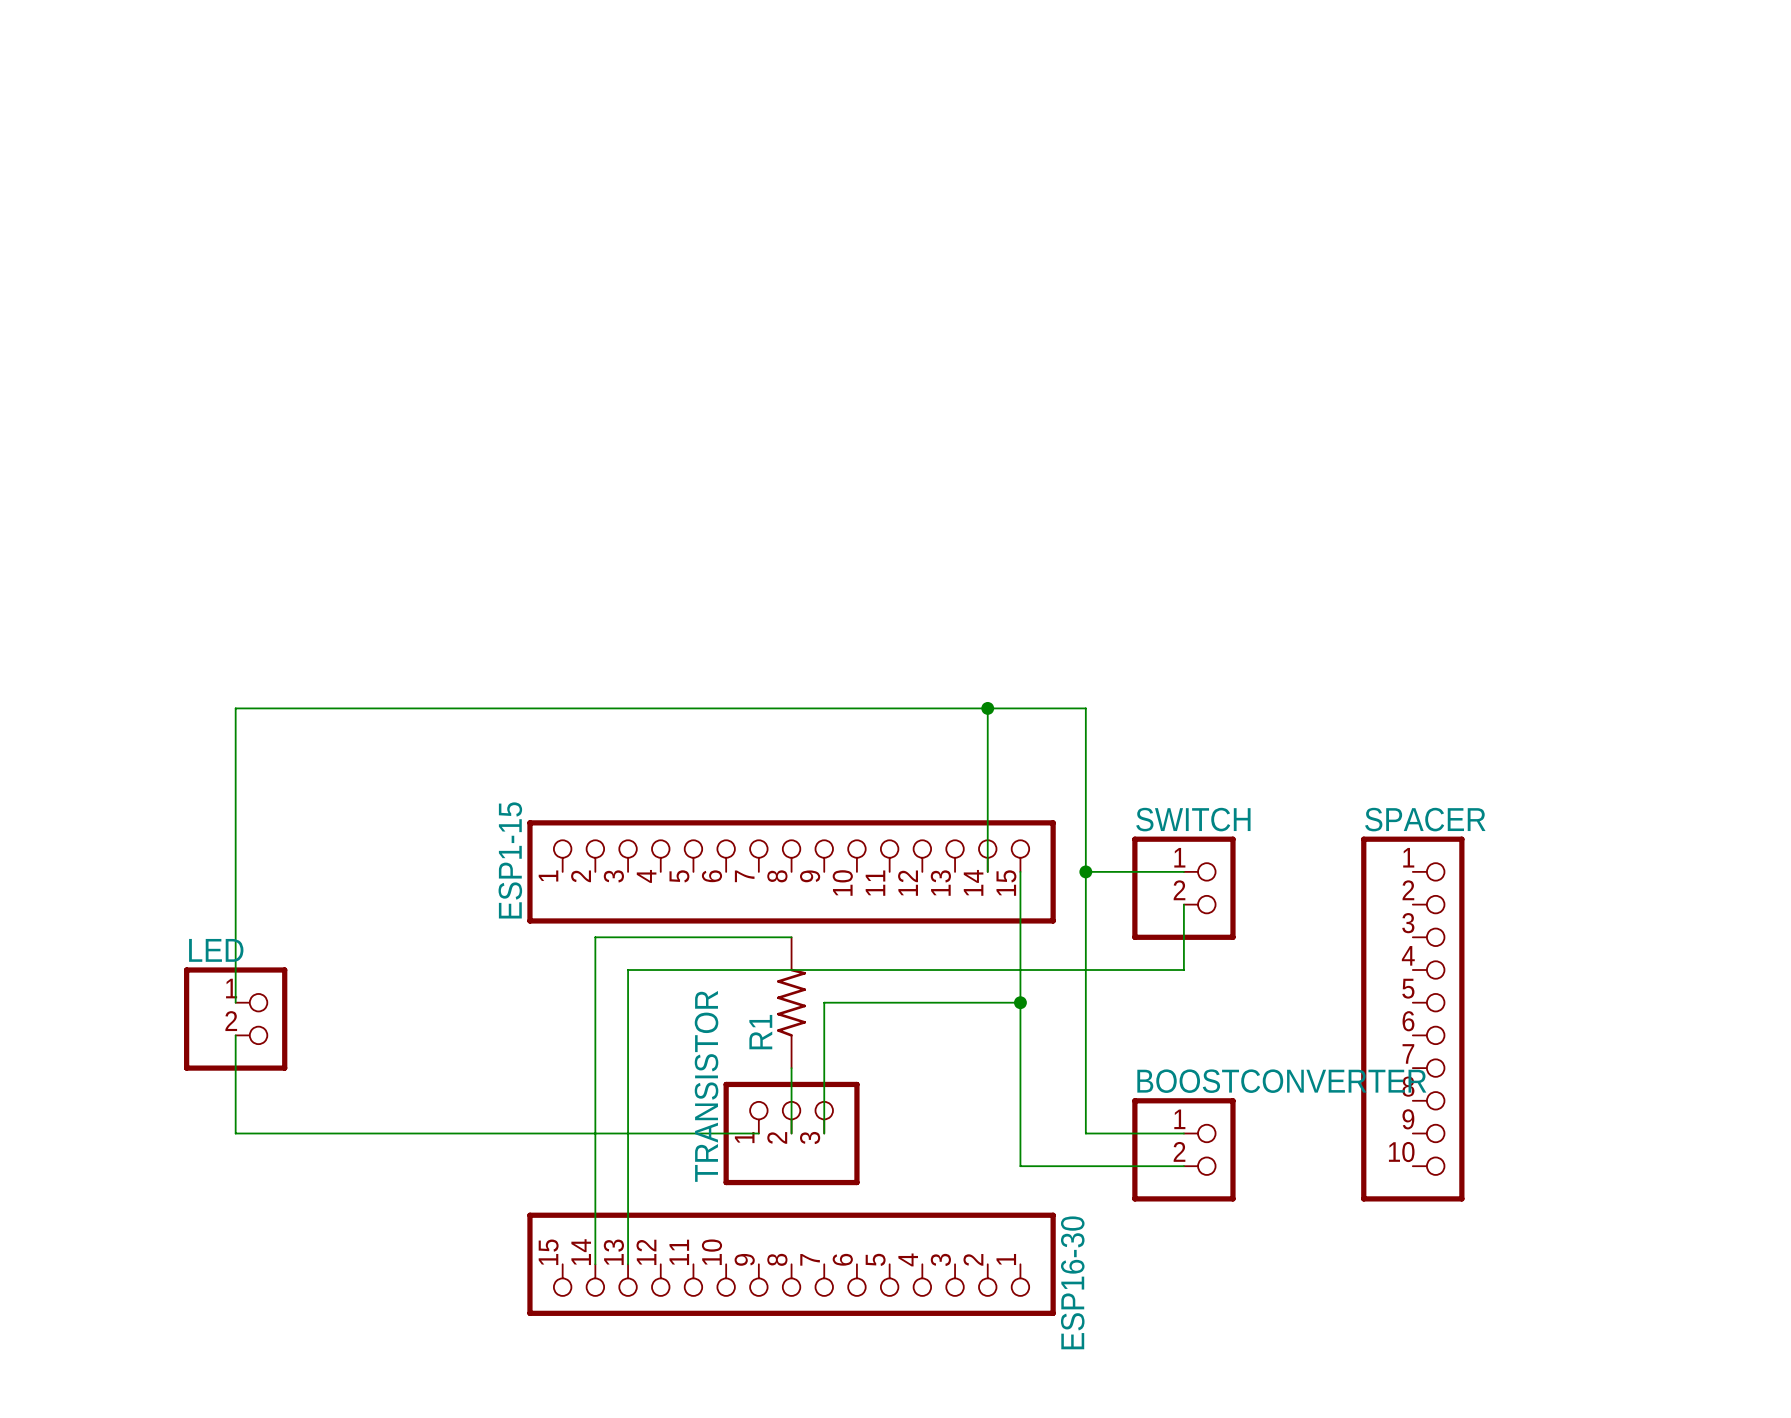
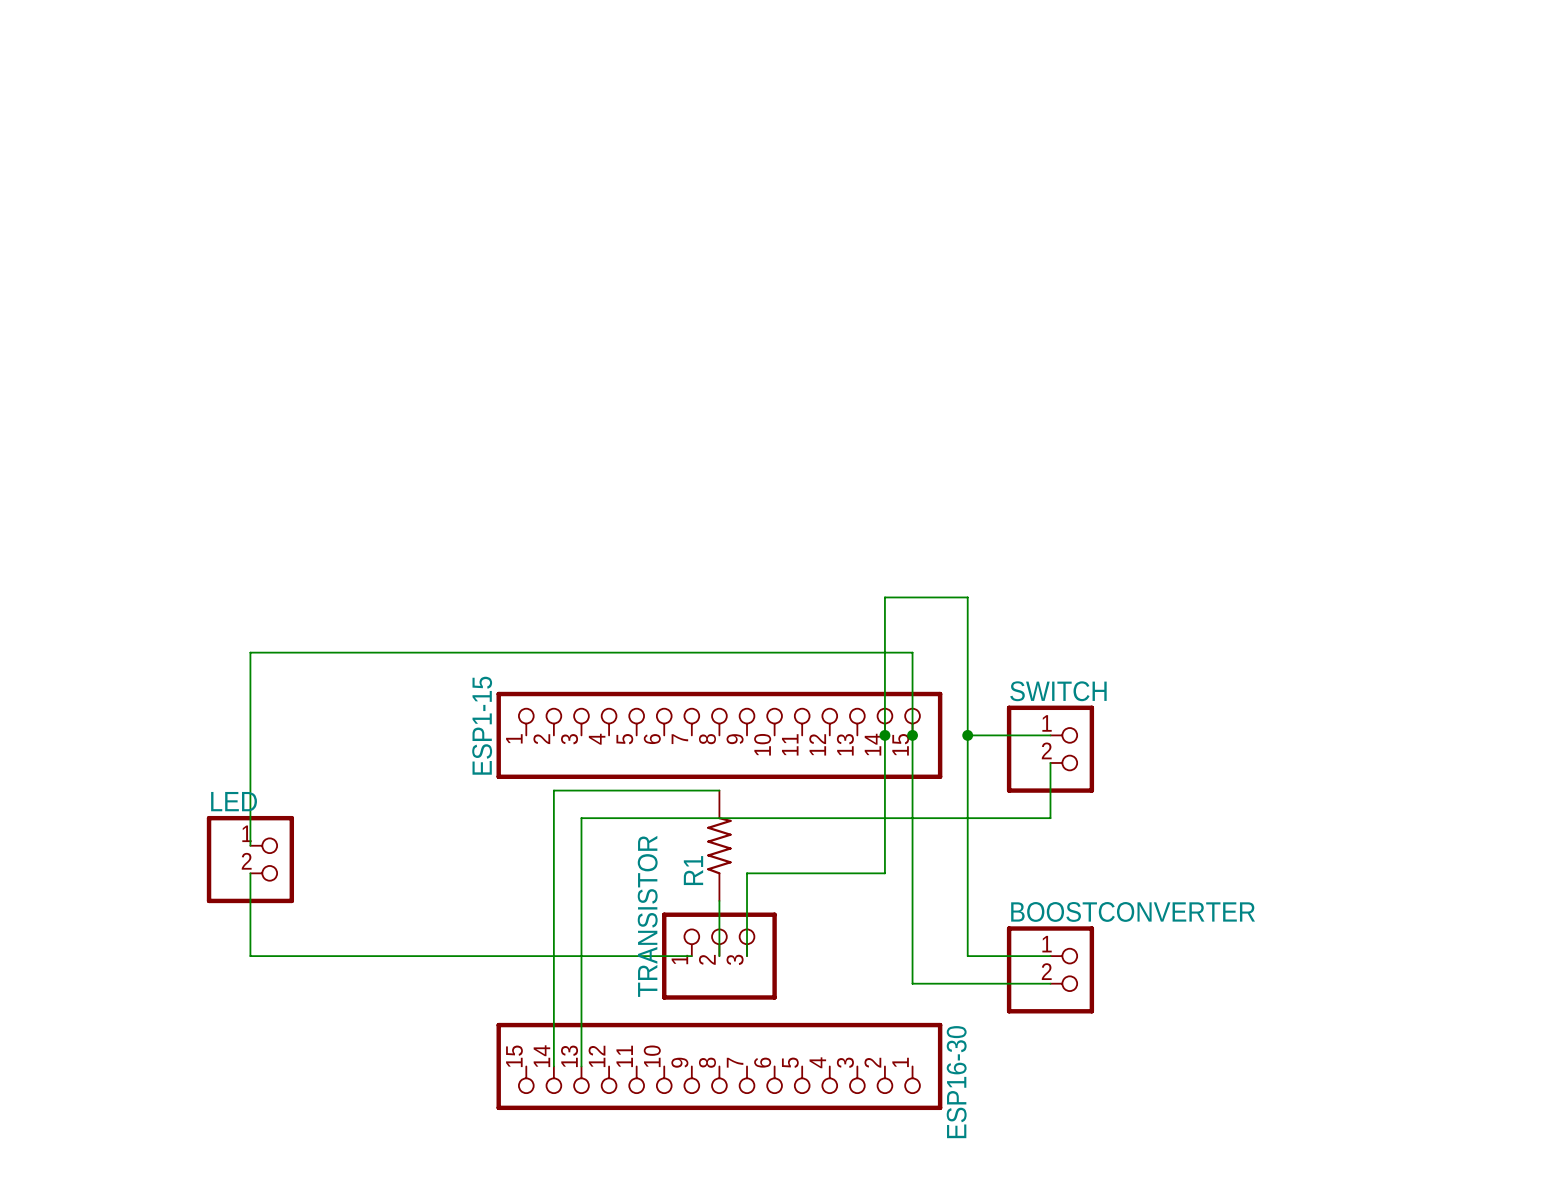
wire: (987, 708) (235, 708) (235, 773) -> (912, 735) (912, 652) (250, 652)
junction: (987, 708) -> none
junction: none -> (884, 735)
junction: none -> (912, 735)
wire: (1020, 1002) (824, 1002) (824, 1035) -> (884, 735) (884, 873) (747, 873)
junction: (1020, 1002) -> none
SPACER: (1412, 1019) -> none

